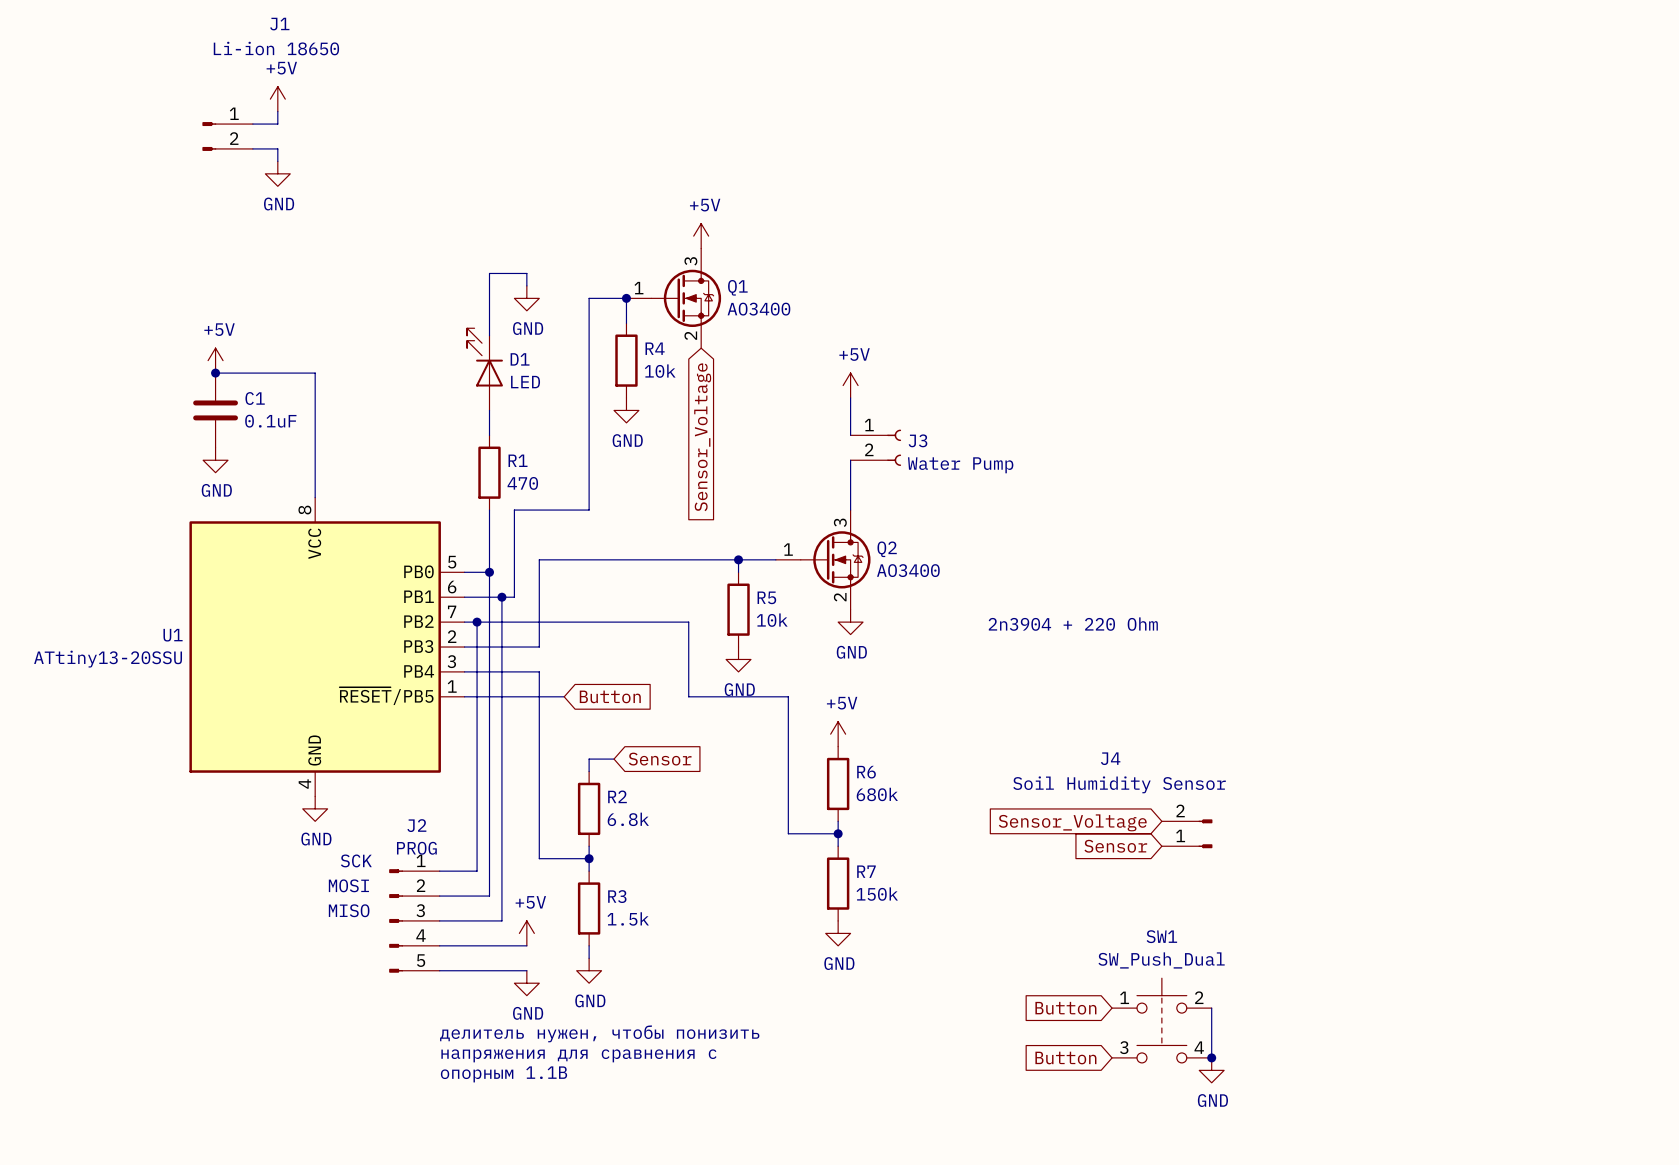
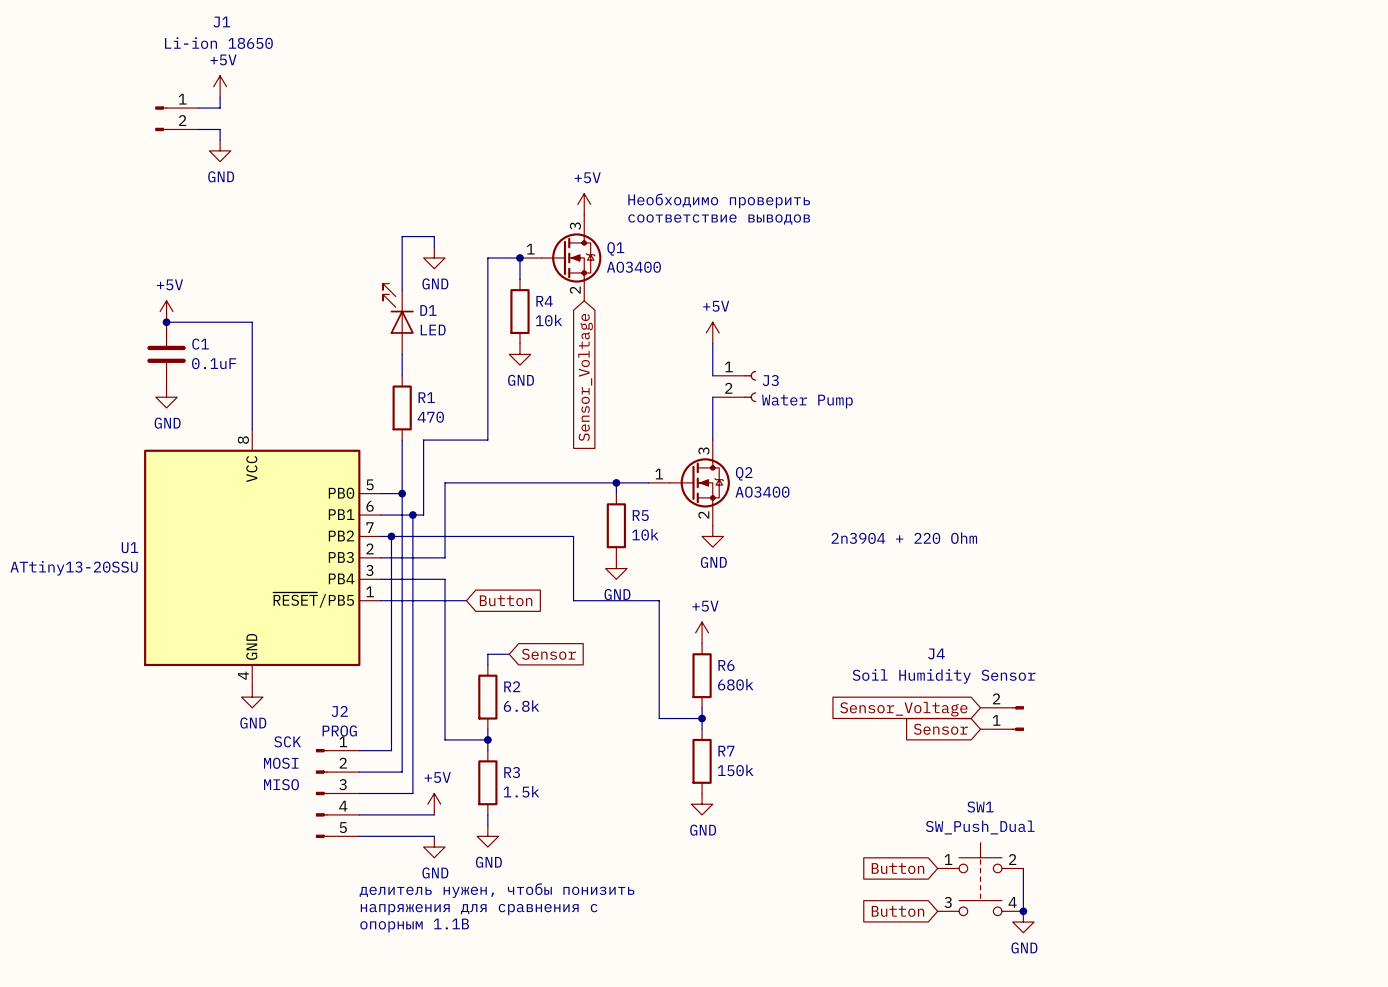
text: none -> Необходимо проверить (719, 200)
text: none -> соответствие выводов (719, 219)

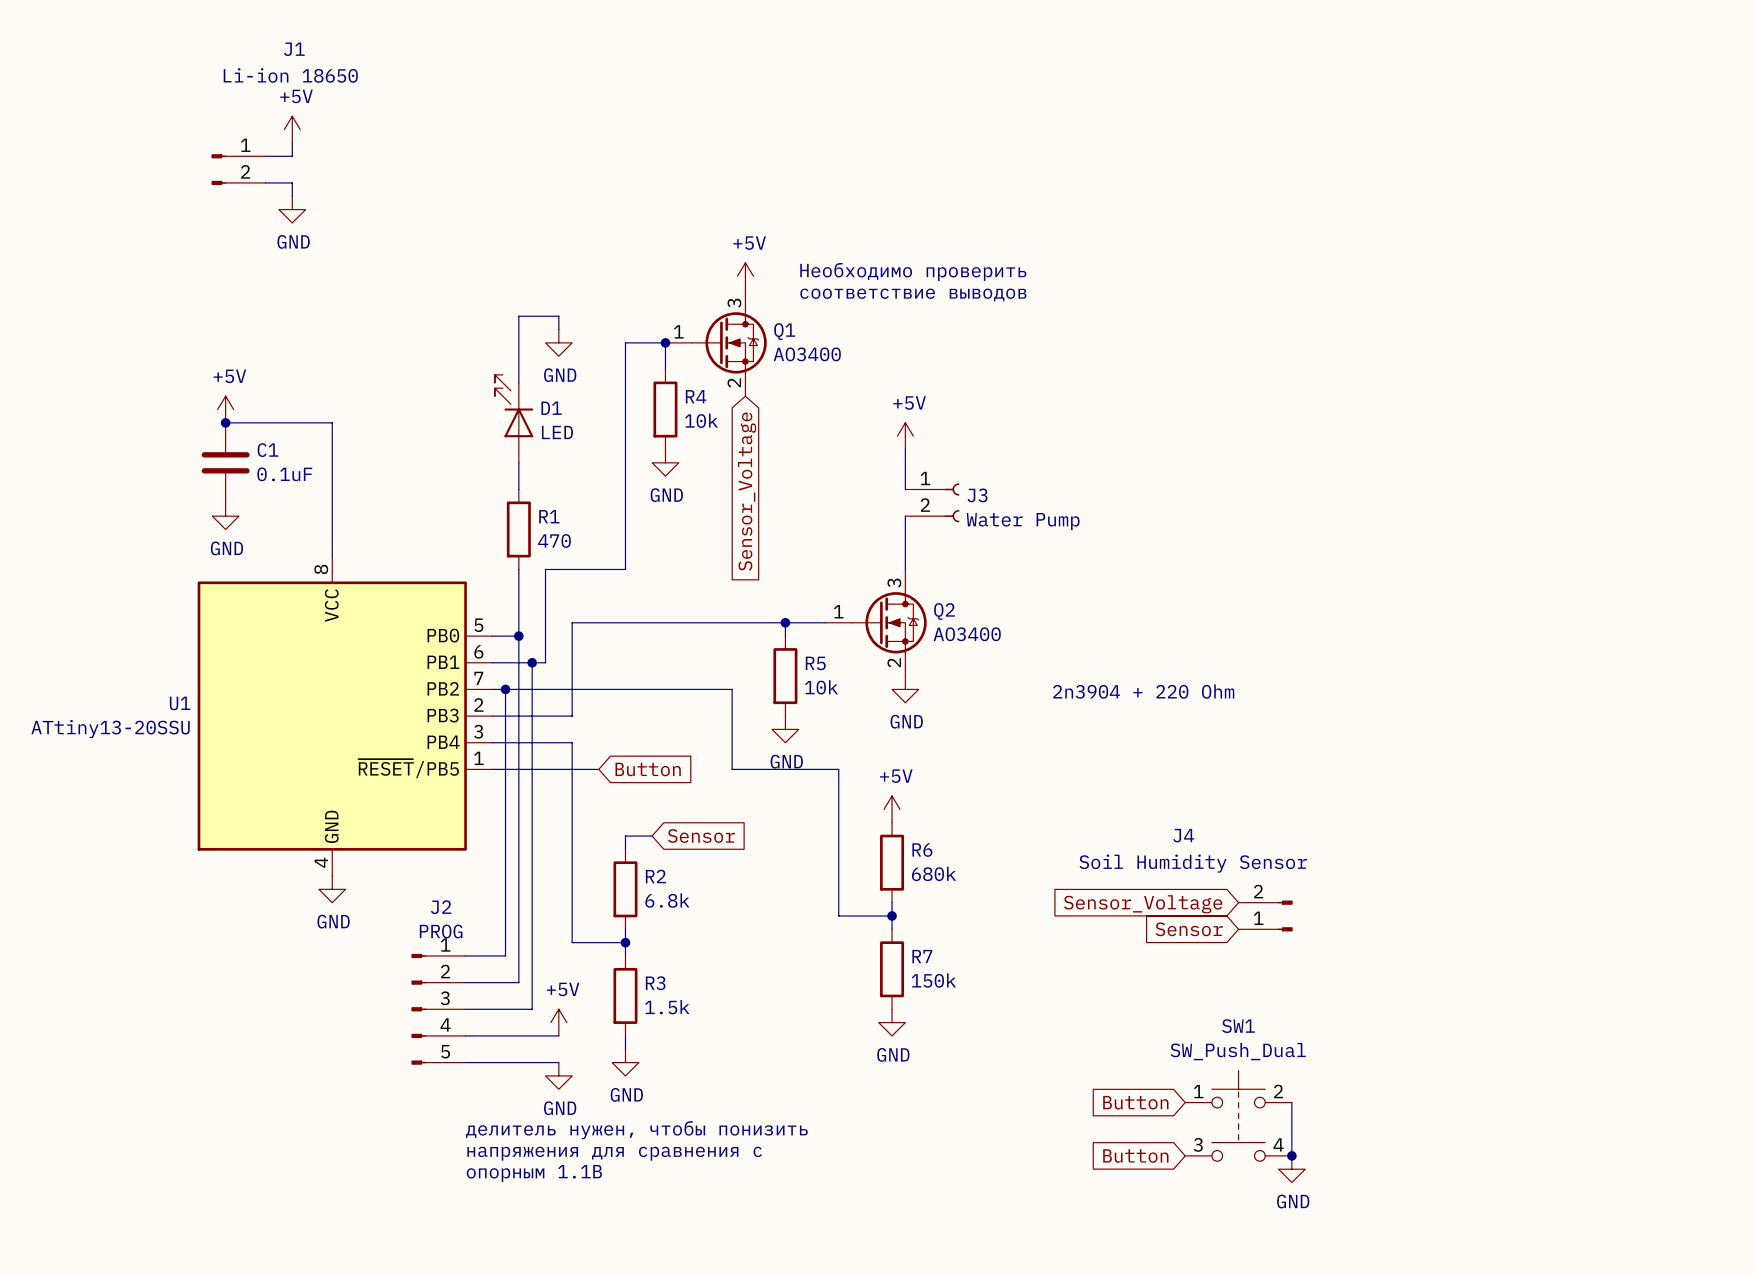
text: SCK (287, 741) -> none
text: MOSI (281, 763) -> none
text: MISO (281, 784) -> none

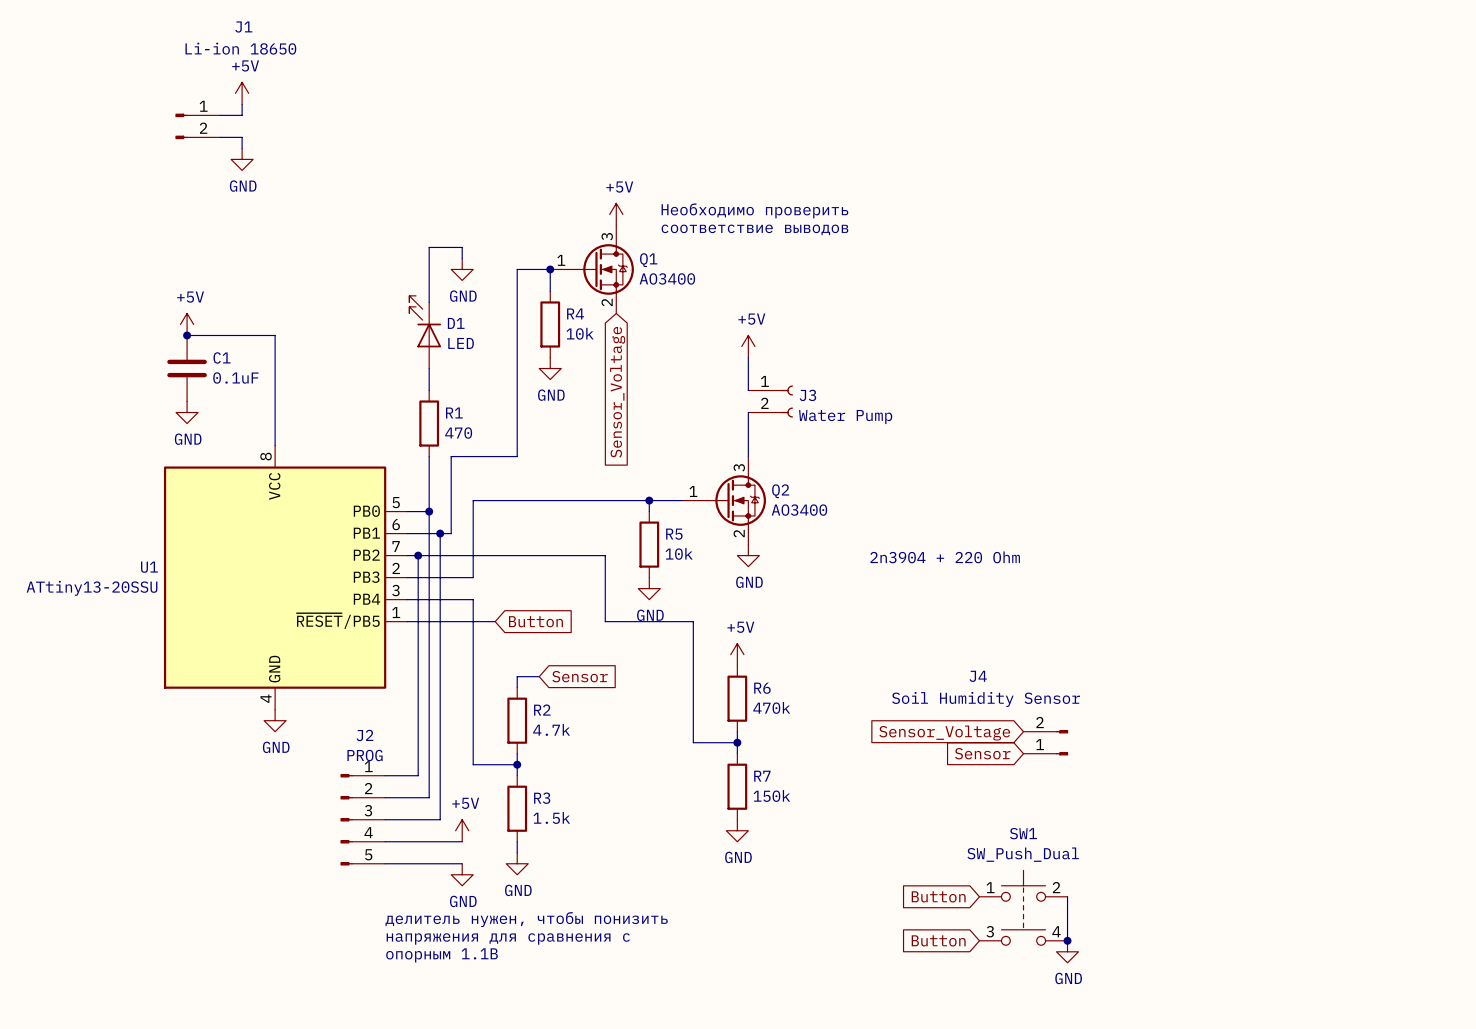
R6 value: 680k (933, 873) -> 470k (771, 707)
R2 value: 6.8k (667, 900) -> 4.7k (551, 729)

